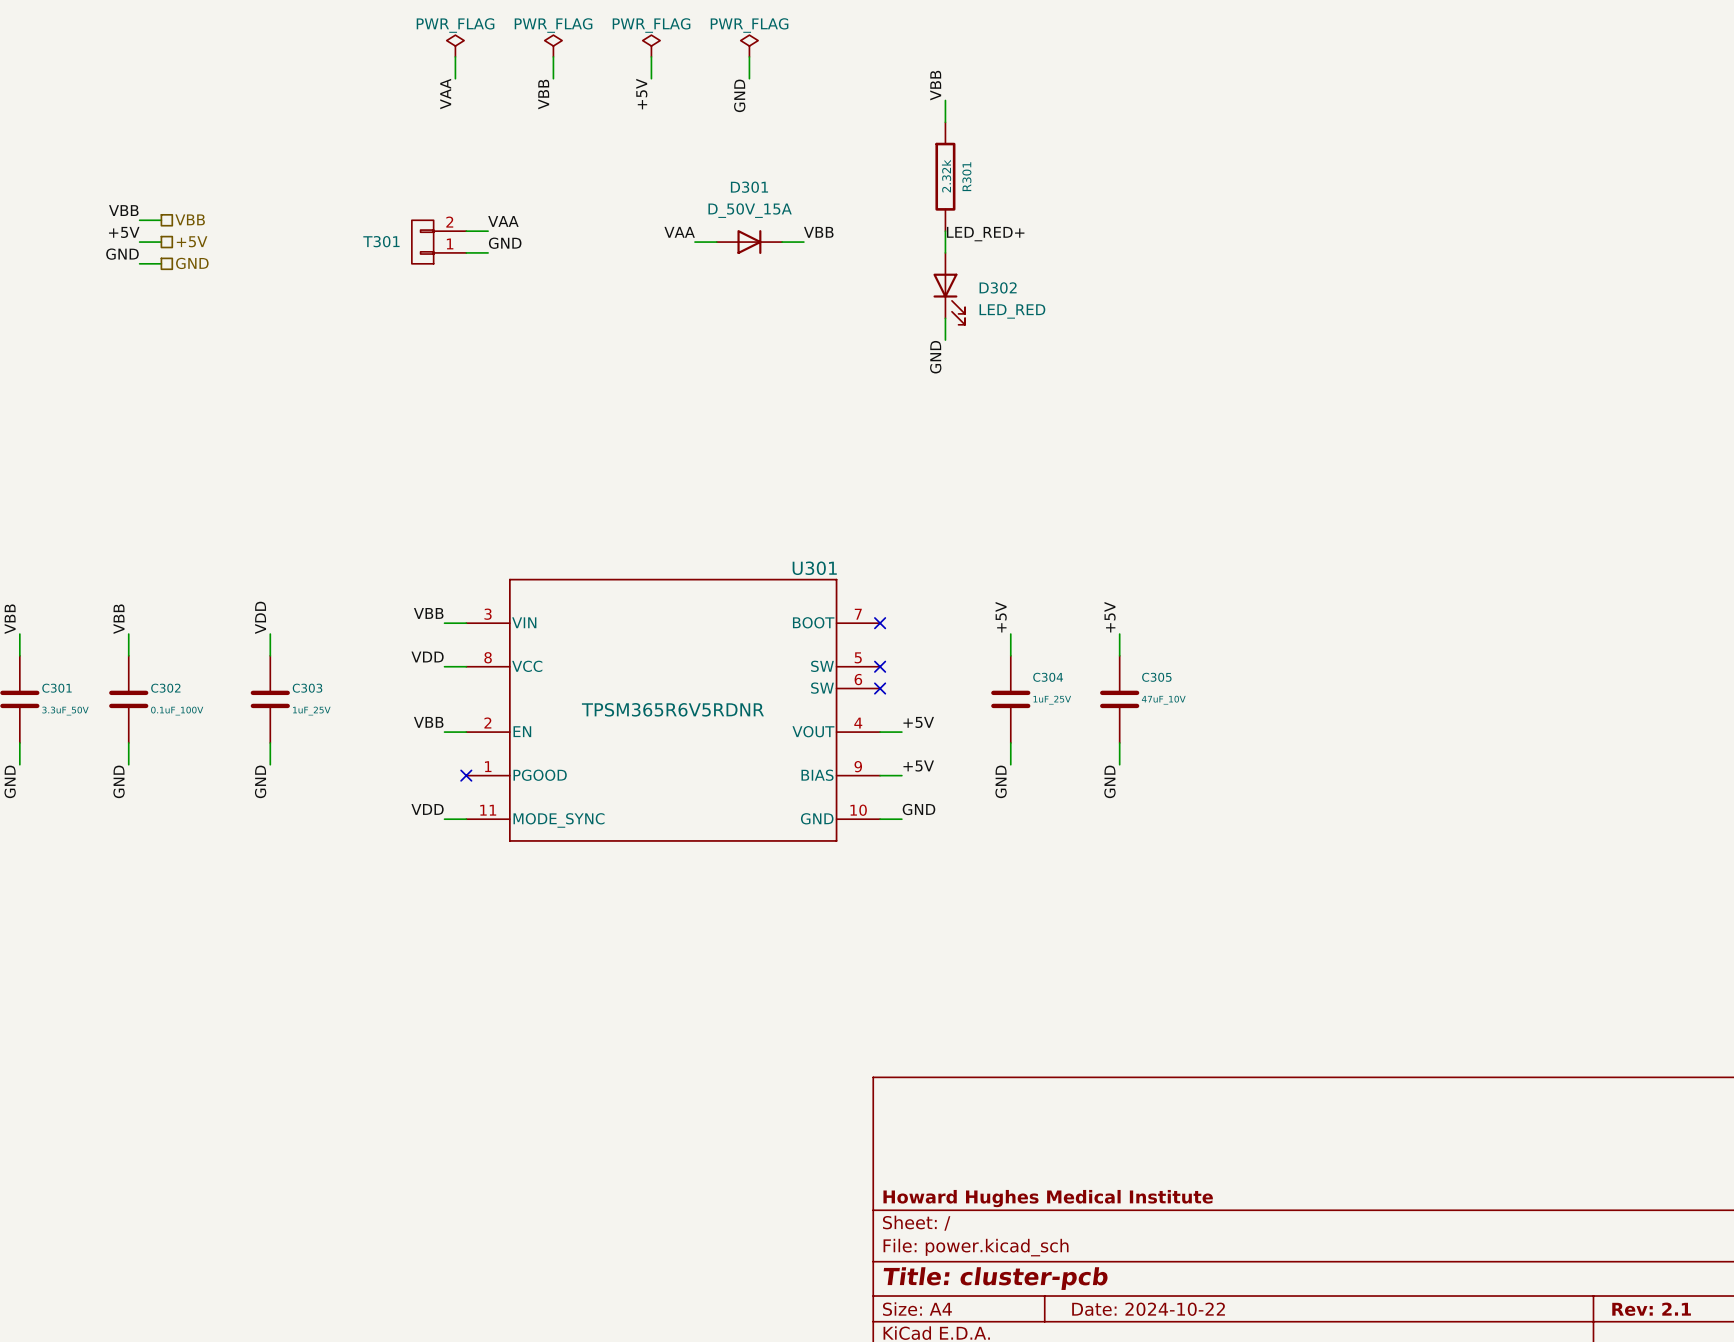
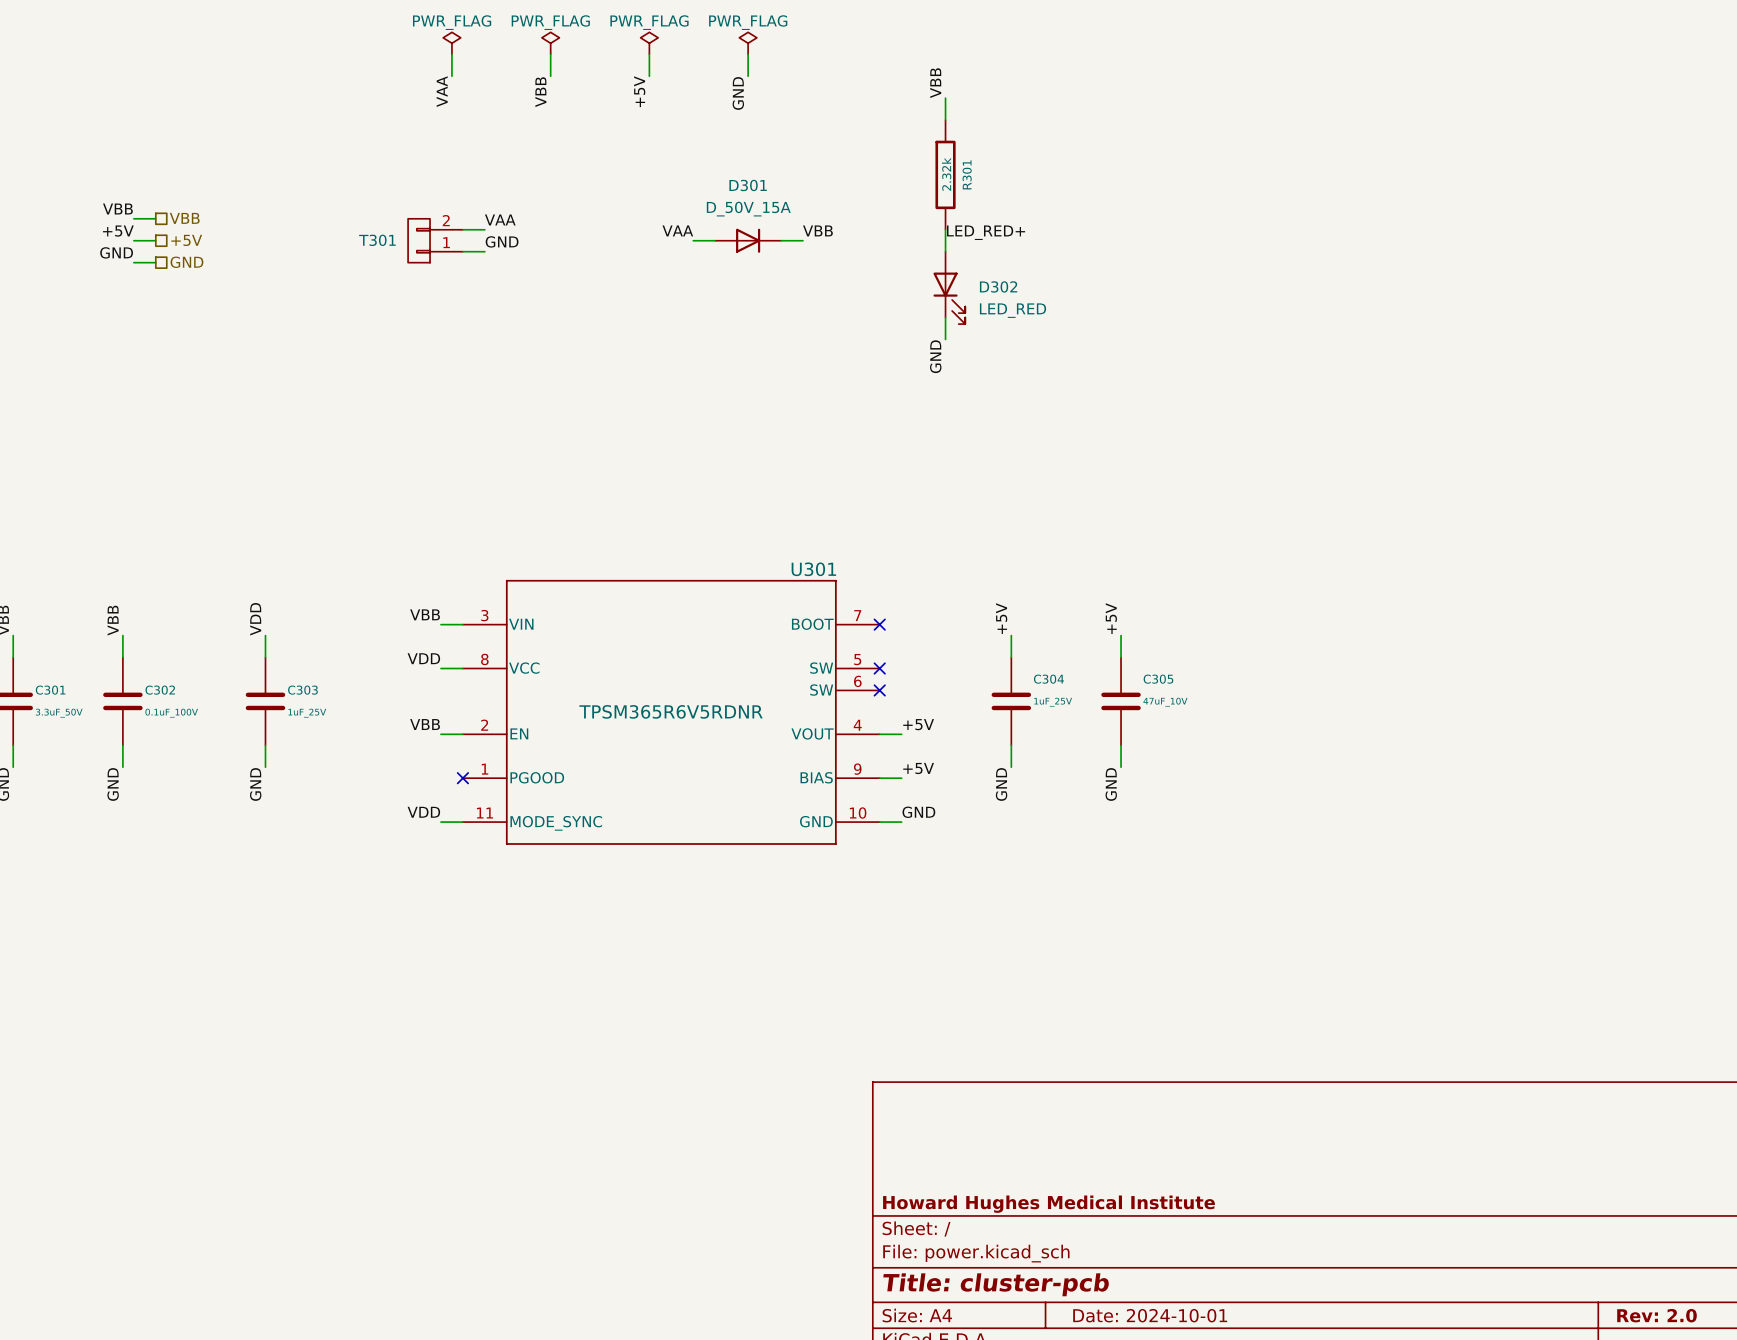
title block: Date: 2024-10-22 (1148, 1309) -> Date: 2024-10-01 (1150, 1315)
title block: Rev: 2.1 (1651, 1309) -> Rev: 2.0 (1656, 1315)

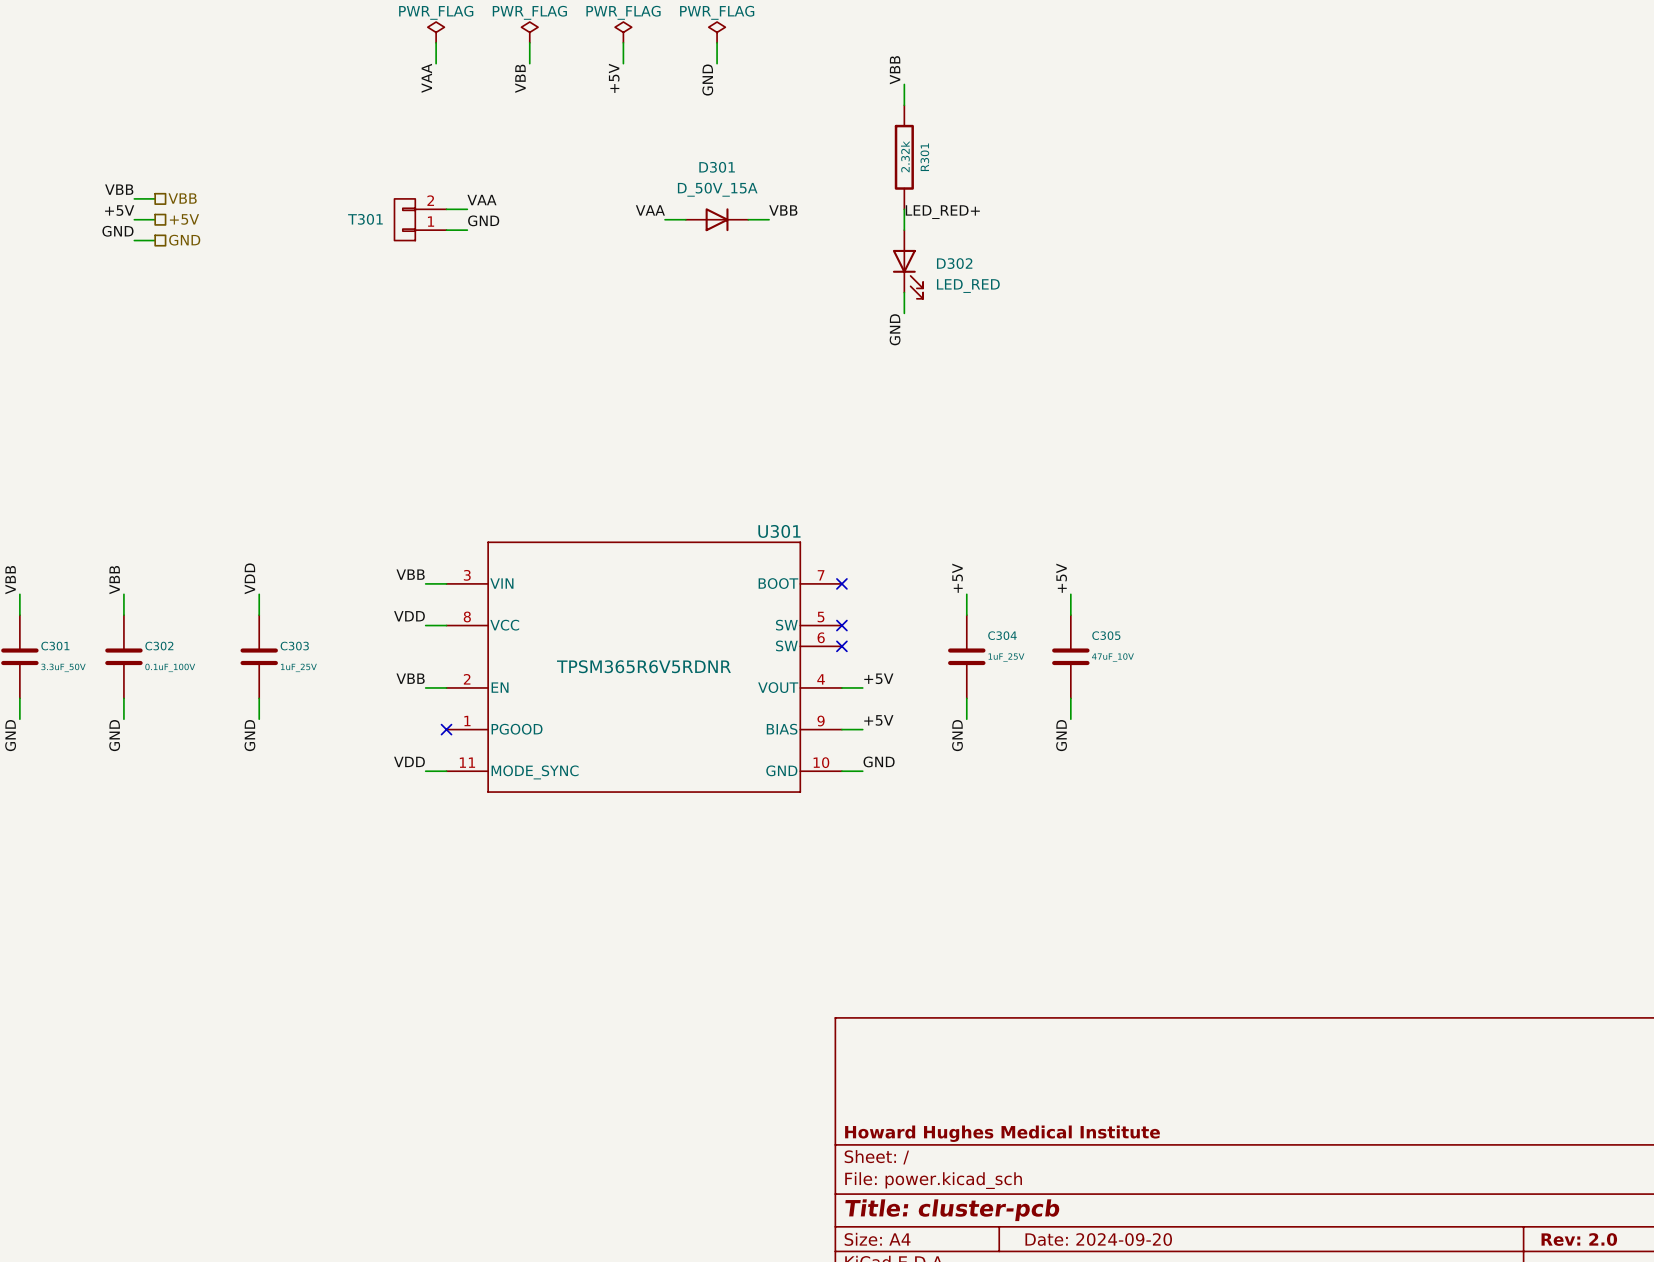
title block: Date: 2024-10-01 (1150, 1315) -> Date: 2024-09-20 (1098, 1239)

